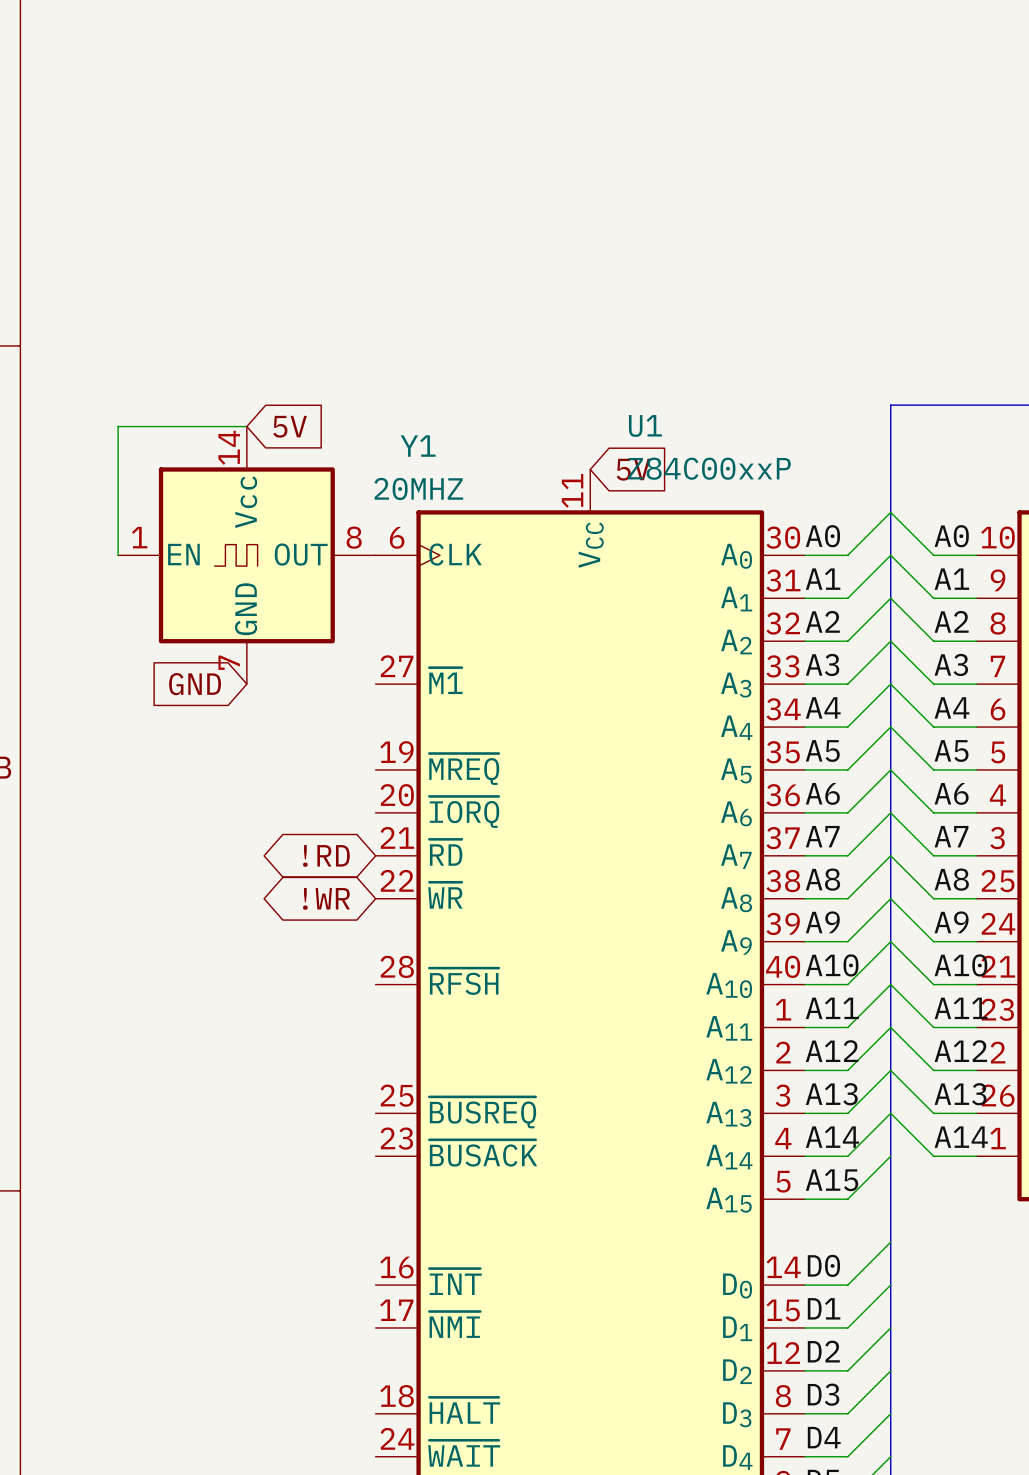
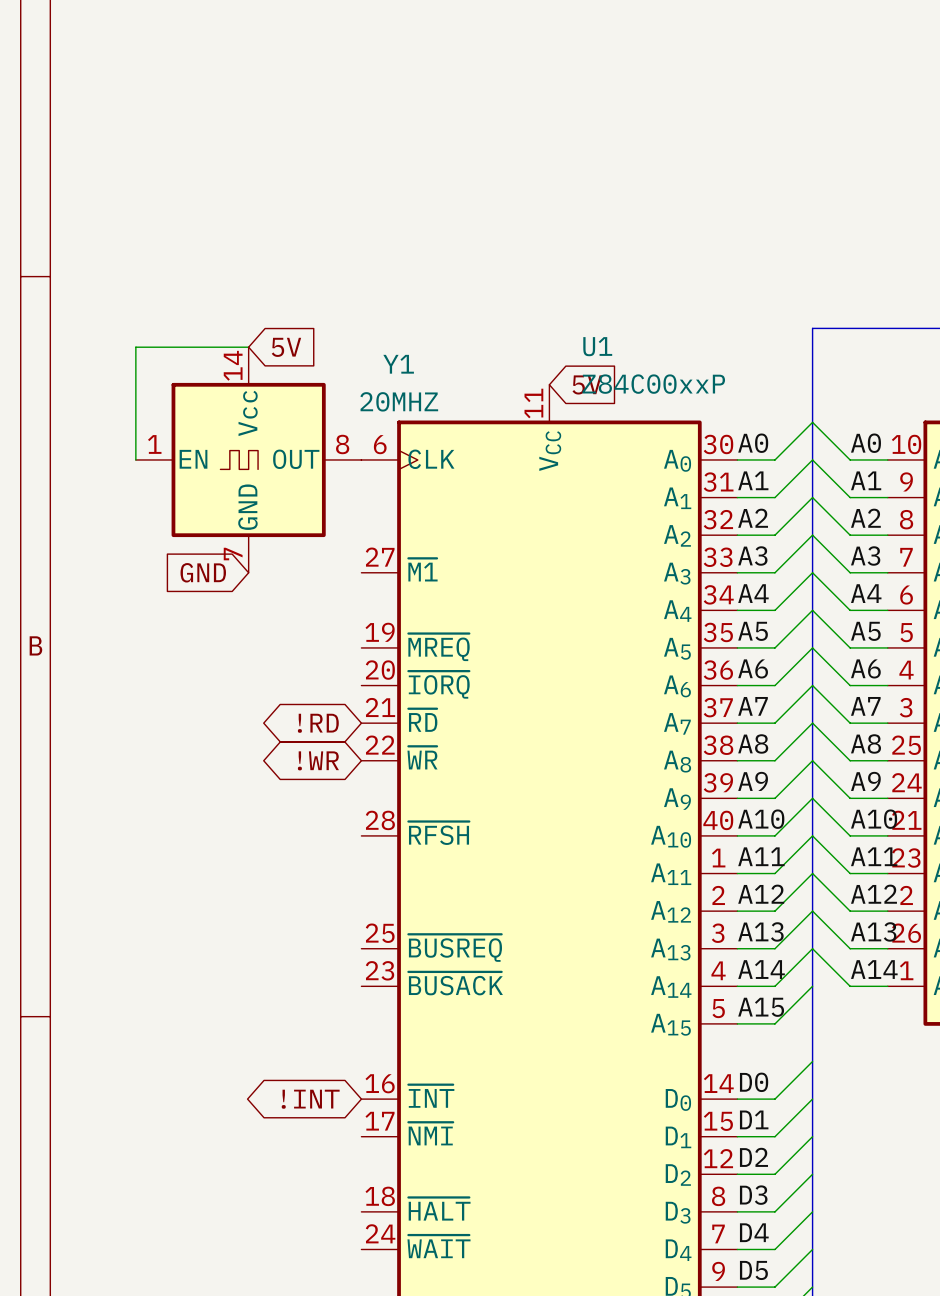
global label: none -> !INT (310, 1099)

